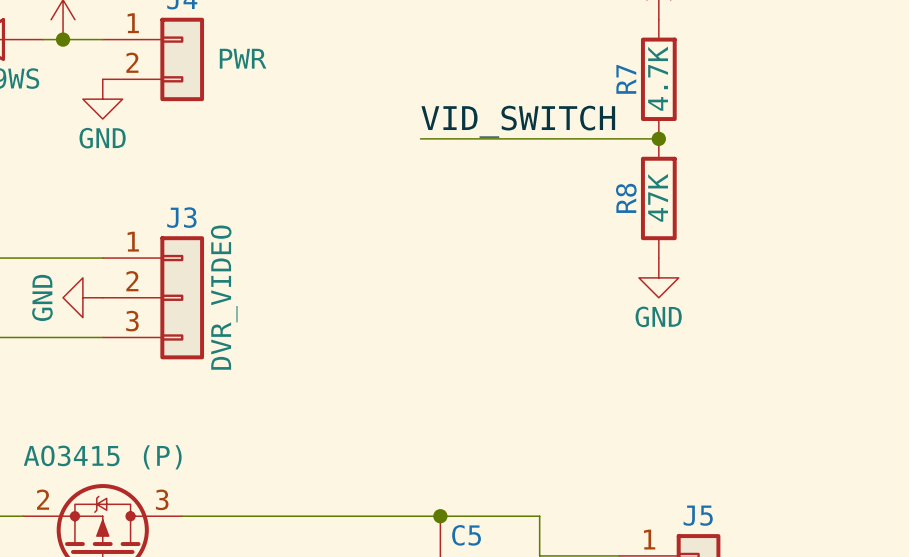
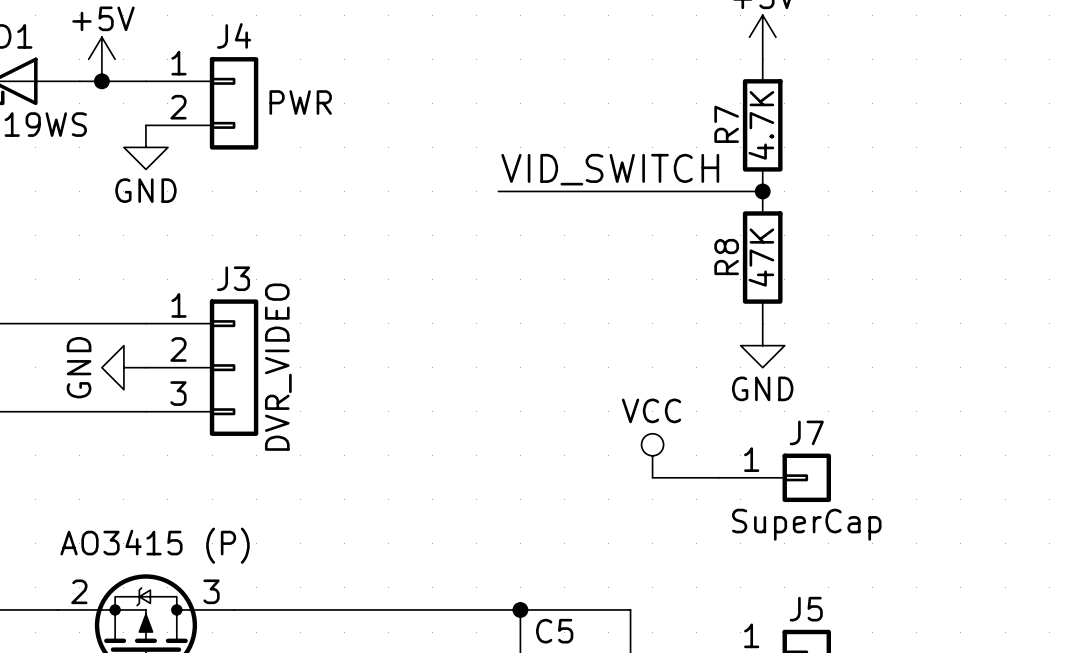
power symbol: none -> VCC (652, 455)
wire: none -> (652, 477) (718, 477)
J7: none -> SuperCap (774, 477)

